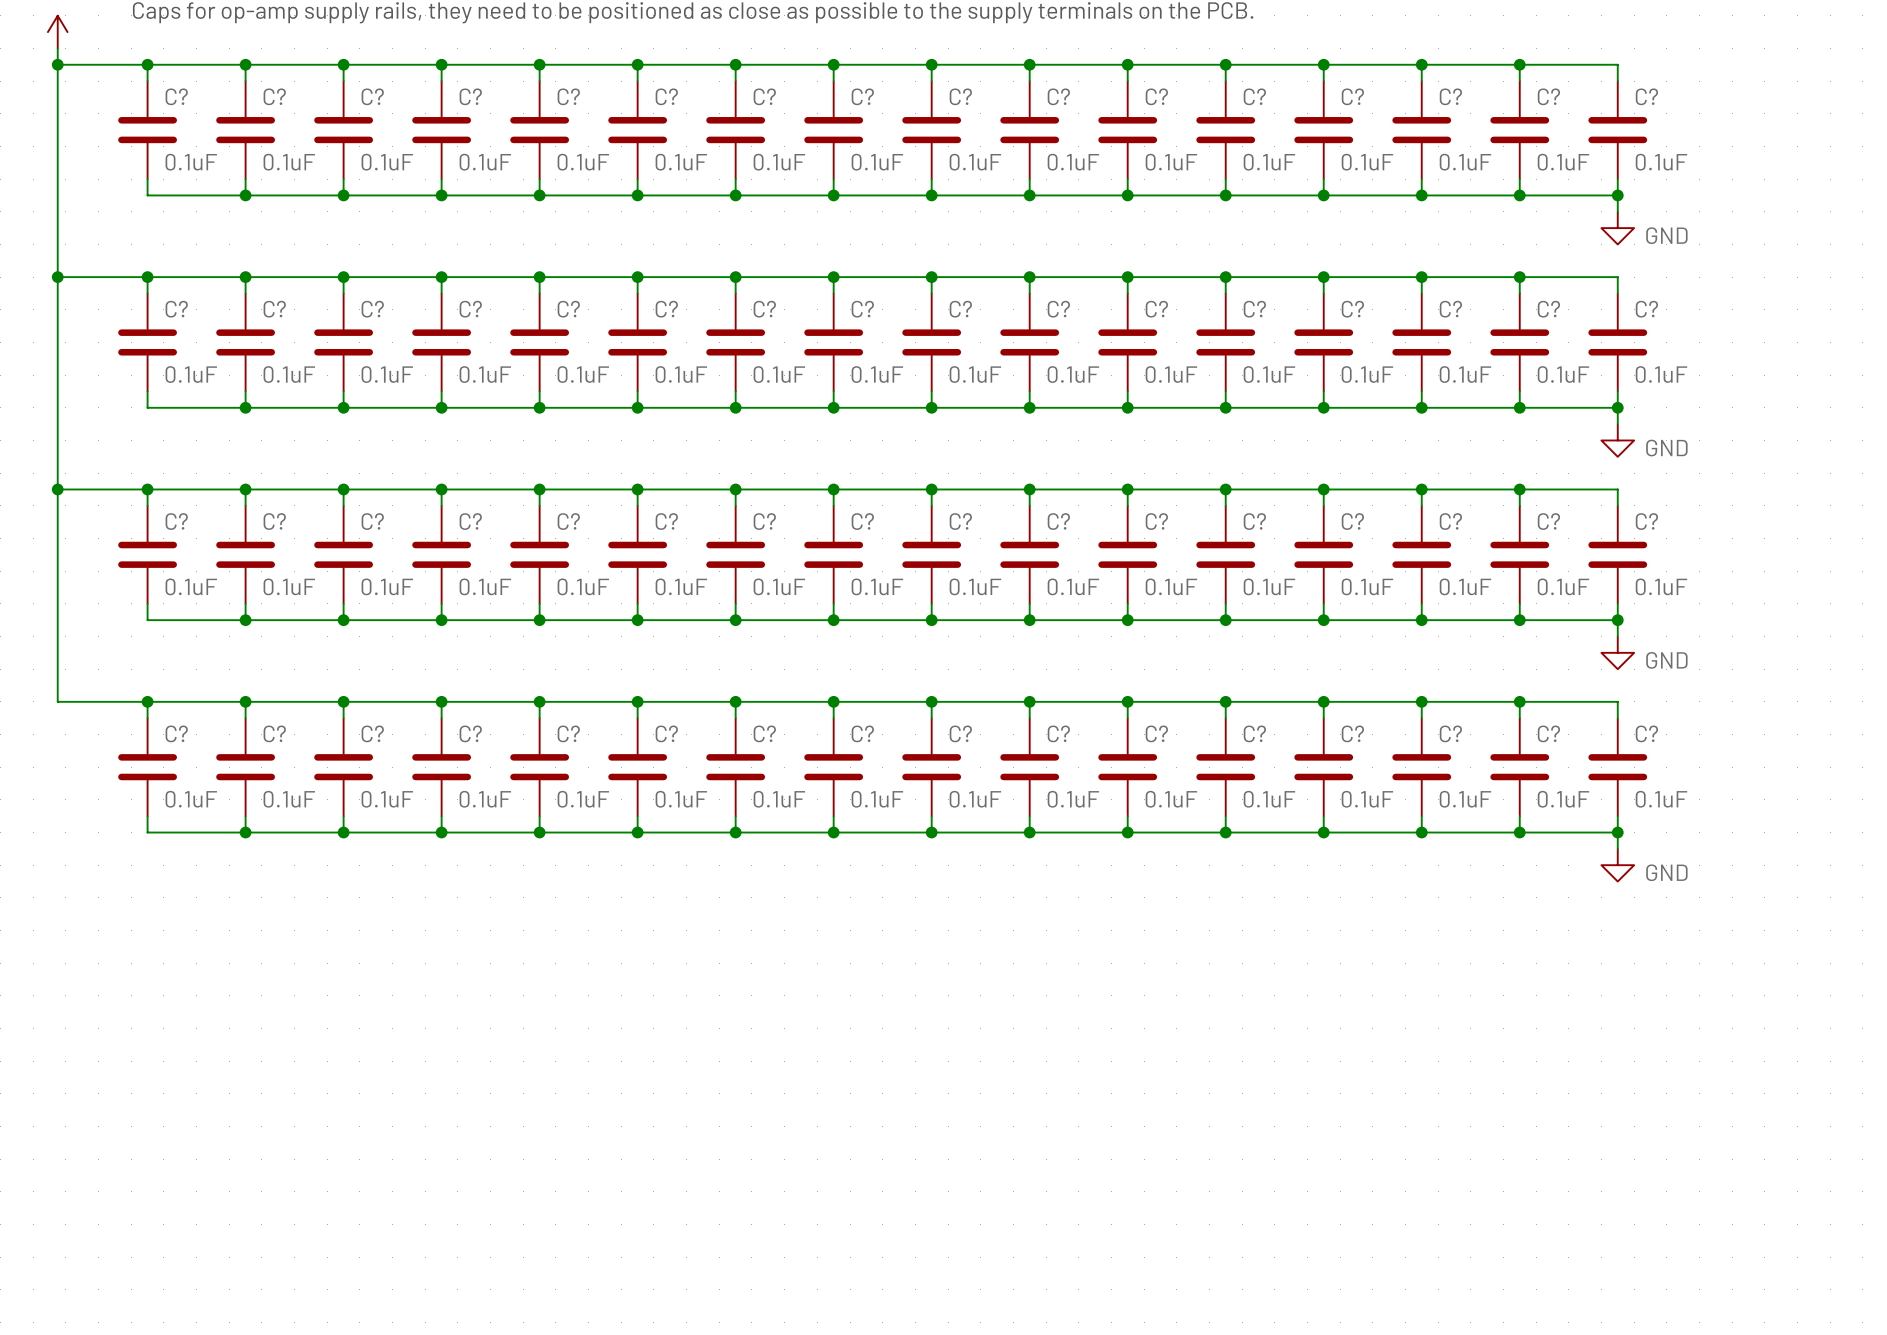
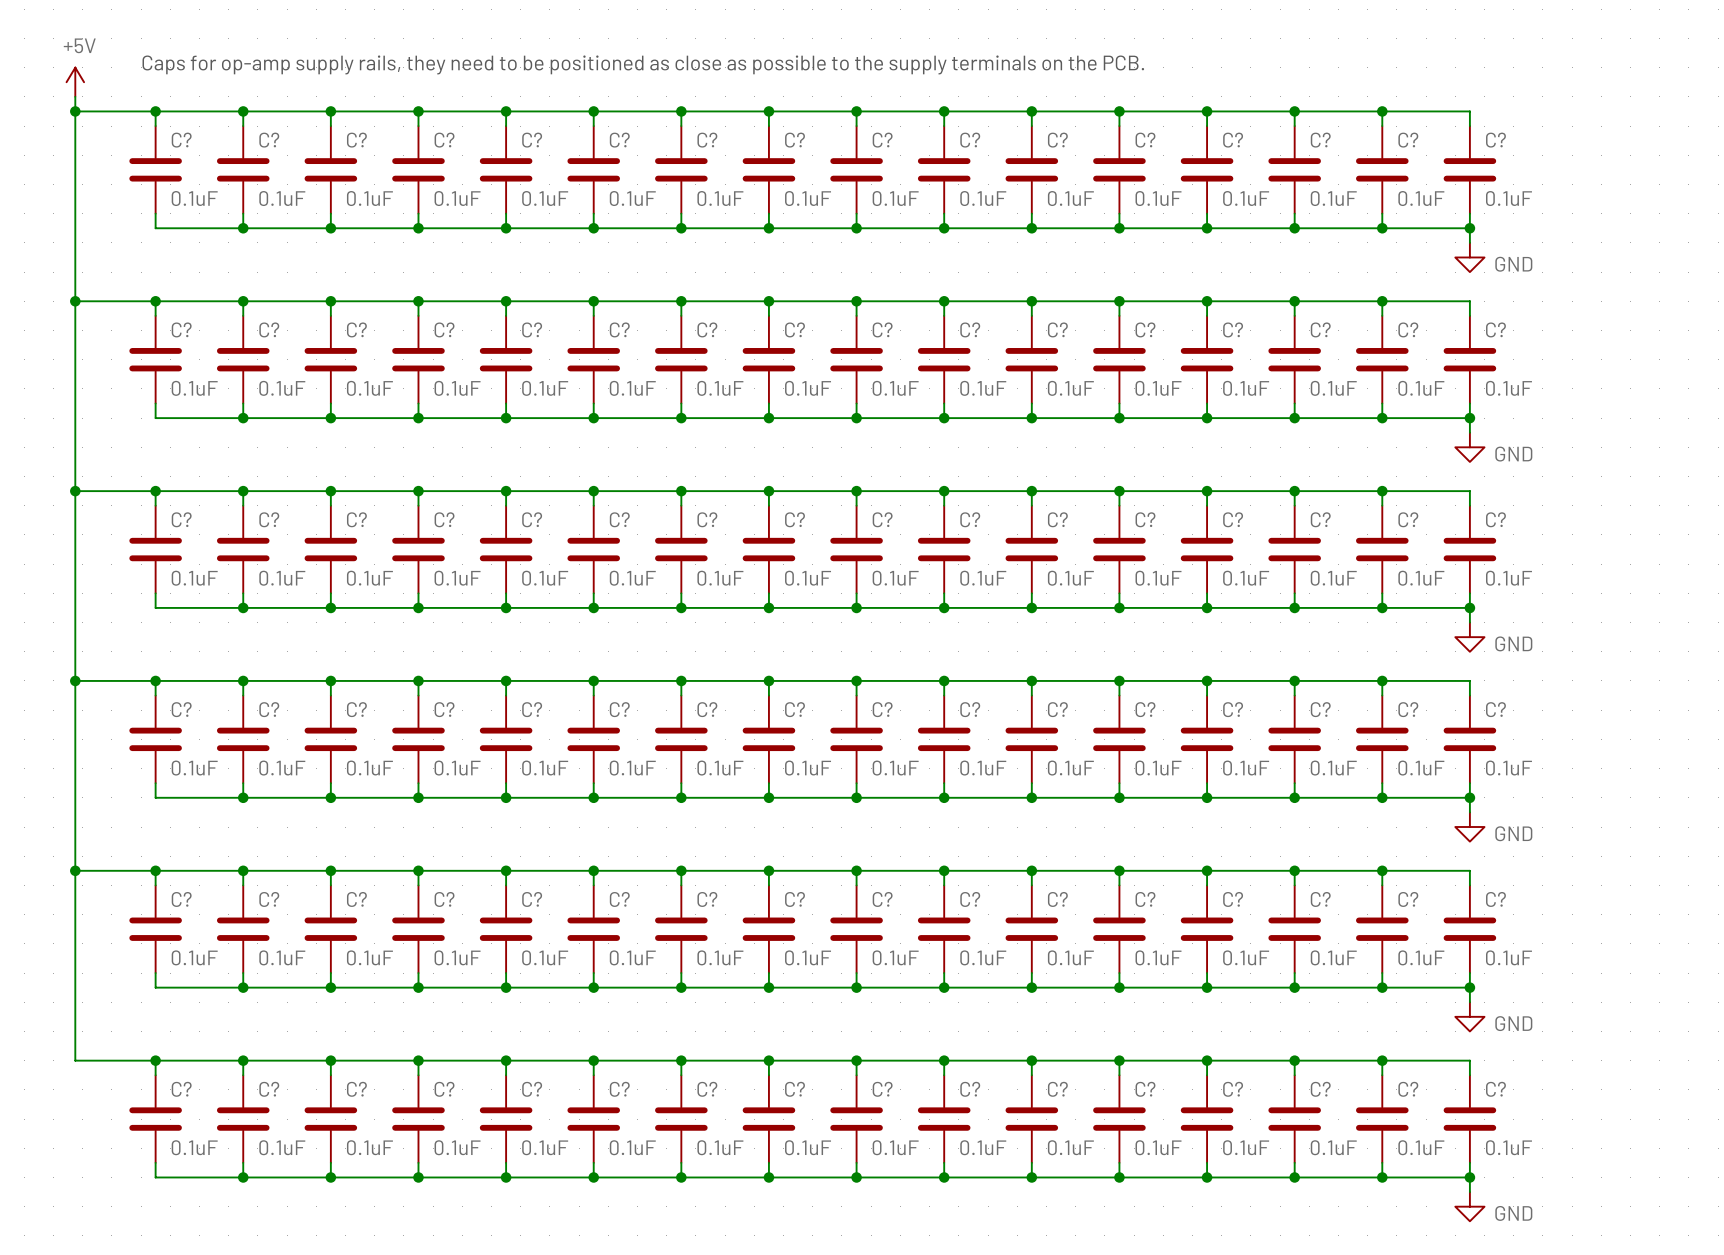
wire: none -> (75, 680) (75, 1060) (1469, 1060) (1469, 1075)
junction: none -> (75, 680)
wire: none -> (75, 870) (1469, 870) (1469, 885)
junction: none -> (75, 870)
wire: none -> (155, 870) (155, 885)
junction: none -> (155, 870)
wire: none -> (243, 870) (243, 885)
junction: none -> (243, 870)
wire: none -> (330, 870) (330, 885)
junction: none -> (330, 870)
wire: none -> (418, 870) (418, 885)
junction: none -> (418, 870)
wire: none -> (506, 870) (506, 885)
junction: none -> (506, 870)
wire: none -> (593, 870) (593, 885)
junction: none -> (593, 870)
wire: none -> (681, 870) (681, 885)
junction: none -> (681, 870)
wire: none -> (768, 870) (768, 885)
junction: none -> (768, 870)
wire: none -> (856, 870) (856, 885)
junction: none -> (856, 870)
wire: none -> (944, 870) (944, 885)
junction: none -> (944, 870)
wire: none -> (1031, 870) (1031, 885)
junction: none -> (1031, 870)
wire: none -> (1119, 870) (1119, 885)
junction: none -> (1119, 870)
wire: none -> (1207, 870) (1207, 885)
junction: none -> (1207, 870)
wire: none -> (1294, 870) (1294, 885)
junction: none -> (1294, 870)
wire: none -> (1382, 870) (1382, 885)
junction: none -> (1382, 870)
C?: none -> 0.1uF (155, 929)
C?: none -> 0.1uF (243, 929)
C?: none -> 0.1uF (330, 929)
C?: none -> 0.1uF (418, 929)
C?: none -> 0.1uF (506, 929)
C?: none -> 0.1uF (593, 929)
C?: none -> 0.1uF (681, 929)
C?: none -> 0.1uF (768, 929)
C?: none -> 0.1uF (856, 929)
C?: none -> 0.1uF (944, 929)
C?: none -> 0.1uF (1031, 929)
C?: none -> 0.1uF (1119, 929)
C?: none -> 0.1uF (1207, 929)
C?: none -> 0.1uF (1294, 929)
C?: none -> 0.1uF (1382, 929)
C?: none -> 0.1uF (1469, 929)
wire: none -> (155, 973) (155, 987) (1469, 987)
wire: none -> (243, 973) (243, 987)
wire: none -> (330, 973) (330, 987)
wire: none -> (418, 973) (418, 987)
wire: none -> (506, 973) (506, 987)
wire: none -> (593, 973) (593, 987)
wire: none -> (681, 973) (681, 987)
wire: none -> (768, 973) (768, 987)
wire: none -> (856, 973) (856, 987)
wire: none -> (944, 973) (944, 987)
wire: none -> (1031, 973) (1031, 987)
wire: none -> (1119, 973) (1119, 987)
wire: none -> (1207, 973) (1207, 987)
wire: none -> (1294, 973) (1294, 987)
wire: none -> (1382, 973) (1382, 987)
wire: none -> (1469, 973) (1469, 1002)
junction: none -> (243, 987)
junction: none -> (330, 987)
junction: none -> (418, 987)
junction: none -> (506, 987)
junction: none -> (593, 987)
junction: none -> (681, 987)
junction: none -> (768, 987)
junction: none -> (856, 987)
junction: none -> (944, 987)
junction: none -> (1031, 987)
junction: none -> (1119, 987)
junction: none -> (1207, 987)
junction: none -> (1294, 987)
junction: none -> (1382, 987)
junction: none -> (1469, 987)
power symbol: none -> GND (1469, 1016)
wire: none -> (155, 1060) (155, 1075)
junction: none -> (155, 1060)
wire: none -> (243, 1060) (243, 1075)
junction: none -> (243, 1060)
wire: none -> (330, 1060) (330, 1075)
junction: none -> (330, 1060)
wire: none -> (418, 1060) (418, 1075)
junction: none -> (418, 1060)
wire: none -> (506, 1060) (506, 1075)
junction: none -> (506, 1060)
wire: none -> (593, 1060) (593, 1075)
junction: none -> (593, 1060)
wire: none -> (681, 1060) (681, 1075)
junction: none -> (681, 1060)
wire: none -> (768, 1060) (768, 1075)
junction: none -> (768, 1060)
wire: none -> (856, 1060) (856, 1075)
junction: none -> (856, 1060)
wire: none -> (944, 1060) (944, 1075)
junction: none -> (944, 1060)
wire: none -> (1031, 1060) (1031, 1075)
junction: none -> (1031, 1060)
wire: none -> (1119, 1060) (1119, 1075)
junction: none -> (1119, 1060)
wire: none -> (1207, 1060) (1207, 1075)
junction: none -> (1207, 1060)
wire: none -> (1294, 1060) (1294, 1075)
junction: none -> (1294, 1060)
wire: none -> (1382, 1060) (1382, 1075)
junction: none -> (1382, 1060)
C?: none -> 0.1uF (155, 1119)
C?: none -> 0.1uF (243, 1119)
C?: none -> 0.1uF (330, 1119)
C?: none -> 0.1uF (418, 1119)
C?: none -> 0.1uF (506, 1119)
C?: none -> 0.1uF (593, 1119)
C?: none -> 0.1uF (681, 1119)
C?: none -> 0.1uF (768, 1119)
C?: none -> 0.1uF (856, 1119)
C?: none -> 0.1uF (944, 1119)
C?: none -> 0.1uF (1031, 1119)
C?: none -> 0.1uF (1119, 1119)
C?: none -> 0.1uF (1207, 1119)
C?: none -> 0.1uF (1294, 1119)
C?: none -> 0.1uF (1382, 1119)
C?: none -> 0.1uF (1469, 1119)
wire: none -> (155, 1162) (155, 1177) (1469, 1177)
wire: none -> (243, 1162) (243, 1177)
wire: none -> (330, 1162) (330, 1177)
wire: none -> (418, 1162) (418, 1177)
wire: none -> (506, 1162) (506, 1177)
wire: none -> (593, 1162) (593, 1177)
wire: none -> (681, 1162) (681, 1177)
wire: none -> (768, 1162) (768, 1177)
wire: none -> (856, 1162) (856, 1177)
wire: none -> (944, 1162) (944, 1177)
wire: none -> (1031, 1162) (1031, 1177)
wire: none -> (1119, 1162) (1119, 1177)
wire: none -> (1207, 1162) (1207, 1177)
wire: none -> (1294, 1162) (1294, 1177)
wire: none -> (1382, 1162) (1382, 1177)
wire: none -> (1469, 1162) (1469, 1192)
junction: none -> (243, 1177)
junction: none -> (330, 1177)
junction: none -> (418, 1177)
junction: none -> (506, 1177)
junction: none -> (593, 1177)
junction: none -> (681, 1177)
junction: none -> (768, 1177)
junction: none -> (856, 1177)
junction: none -> (944, 1177)
junction: none -> (1031, 1177)
junction: none -> (1119, 1177)
junction: none -> (1207, 1177)
junction: none -> (1294, 1177)
junction: none -> (1382, 1177)
junction: none -> (1469, 1177)
power symbol: none -> GND (1469, 1206)

